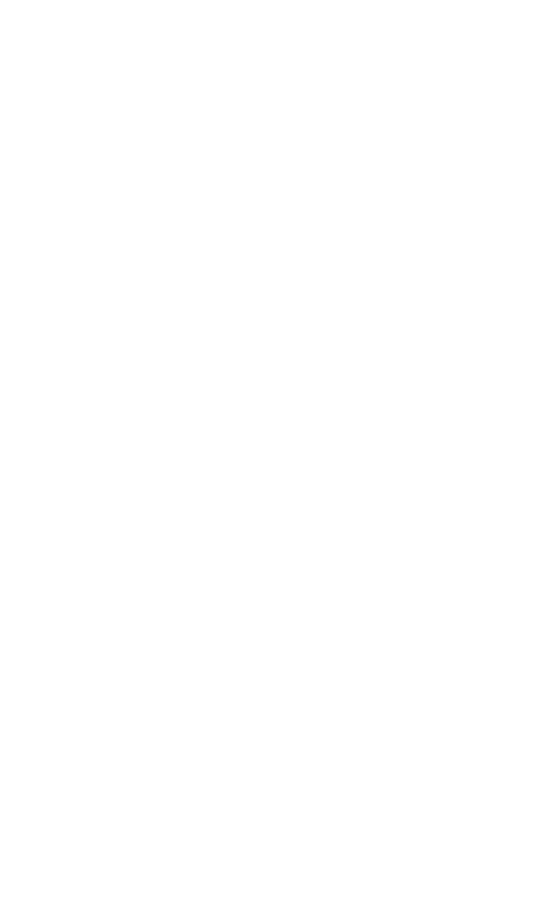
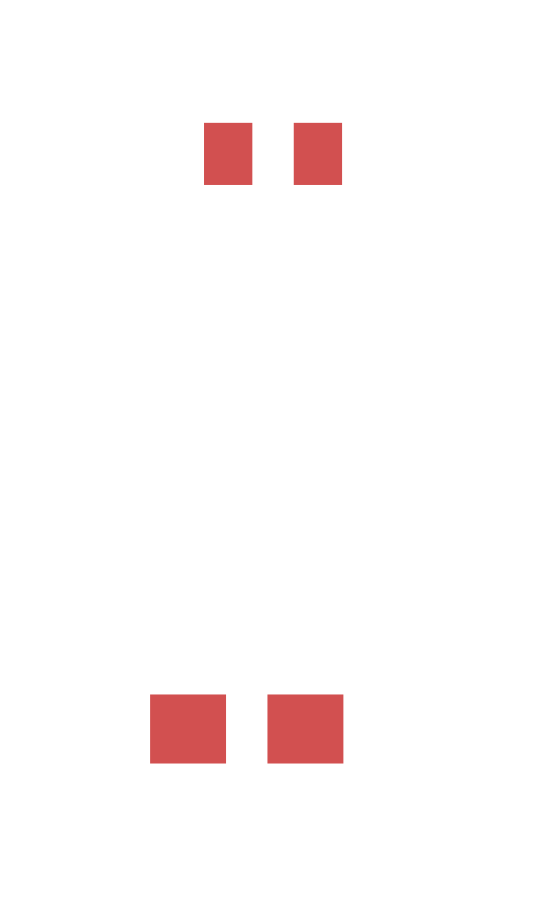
part: none -> (273, 153)
part: none -> (246, 728)

